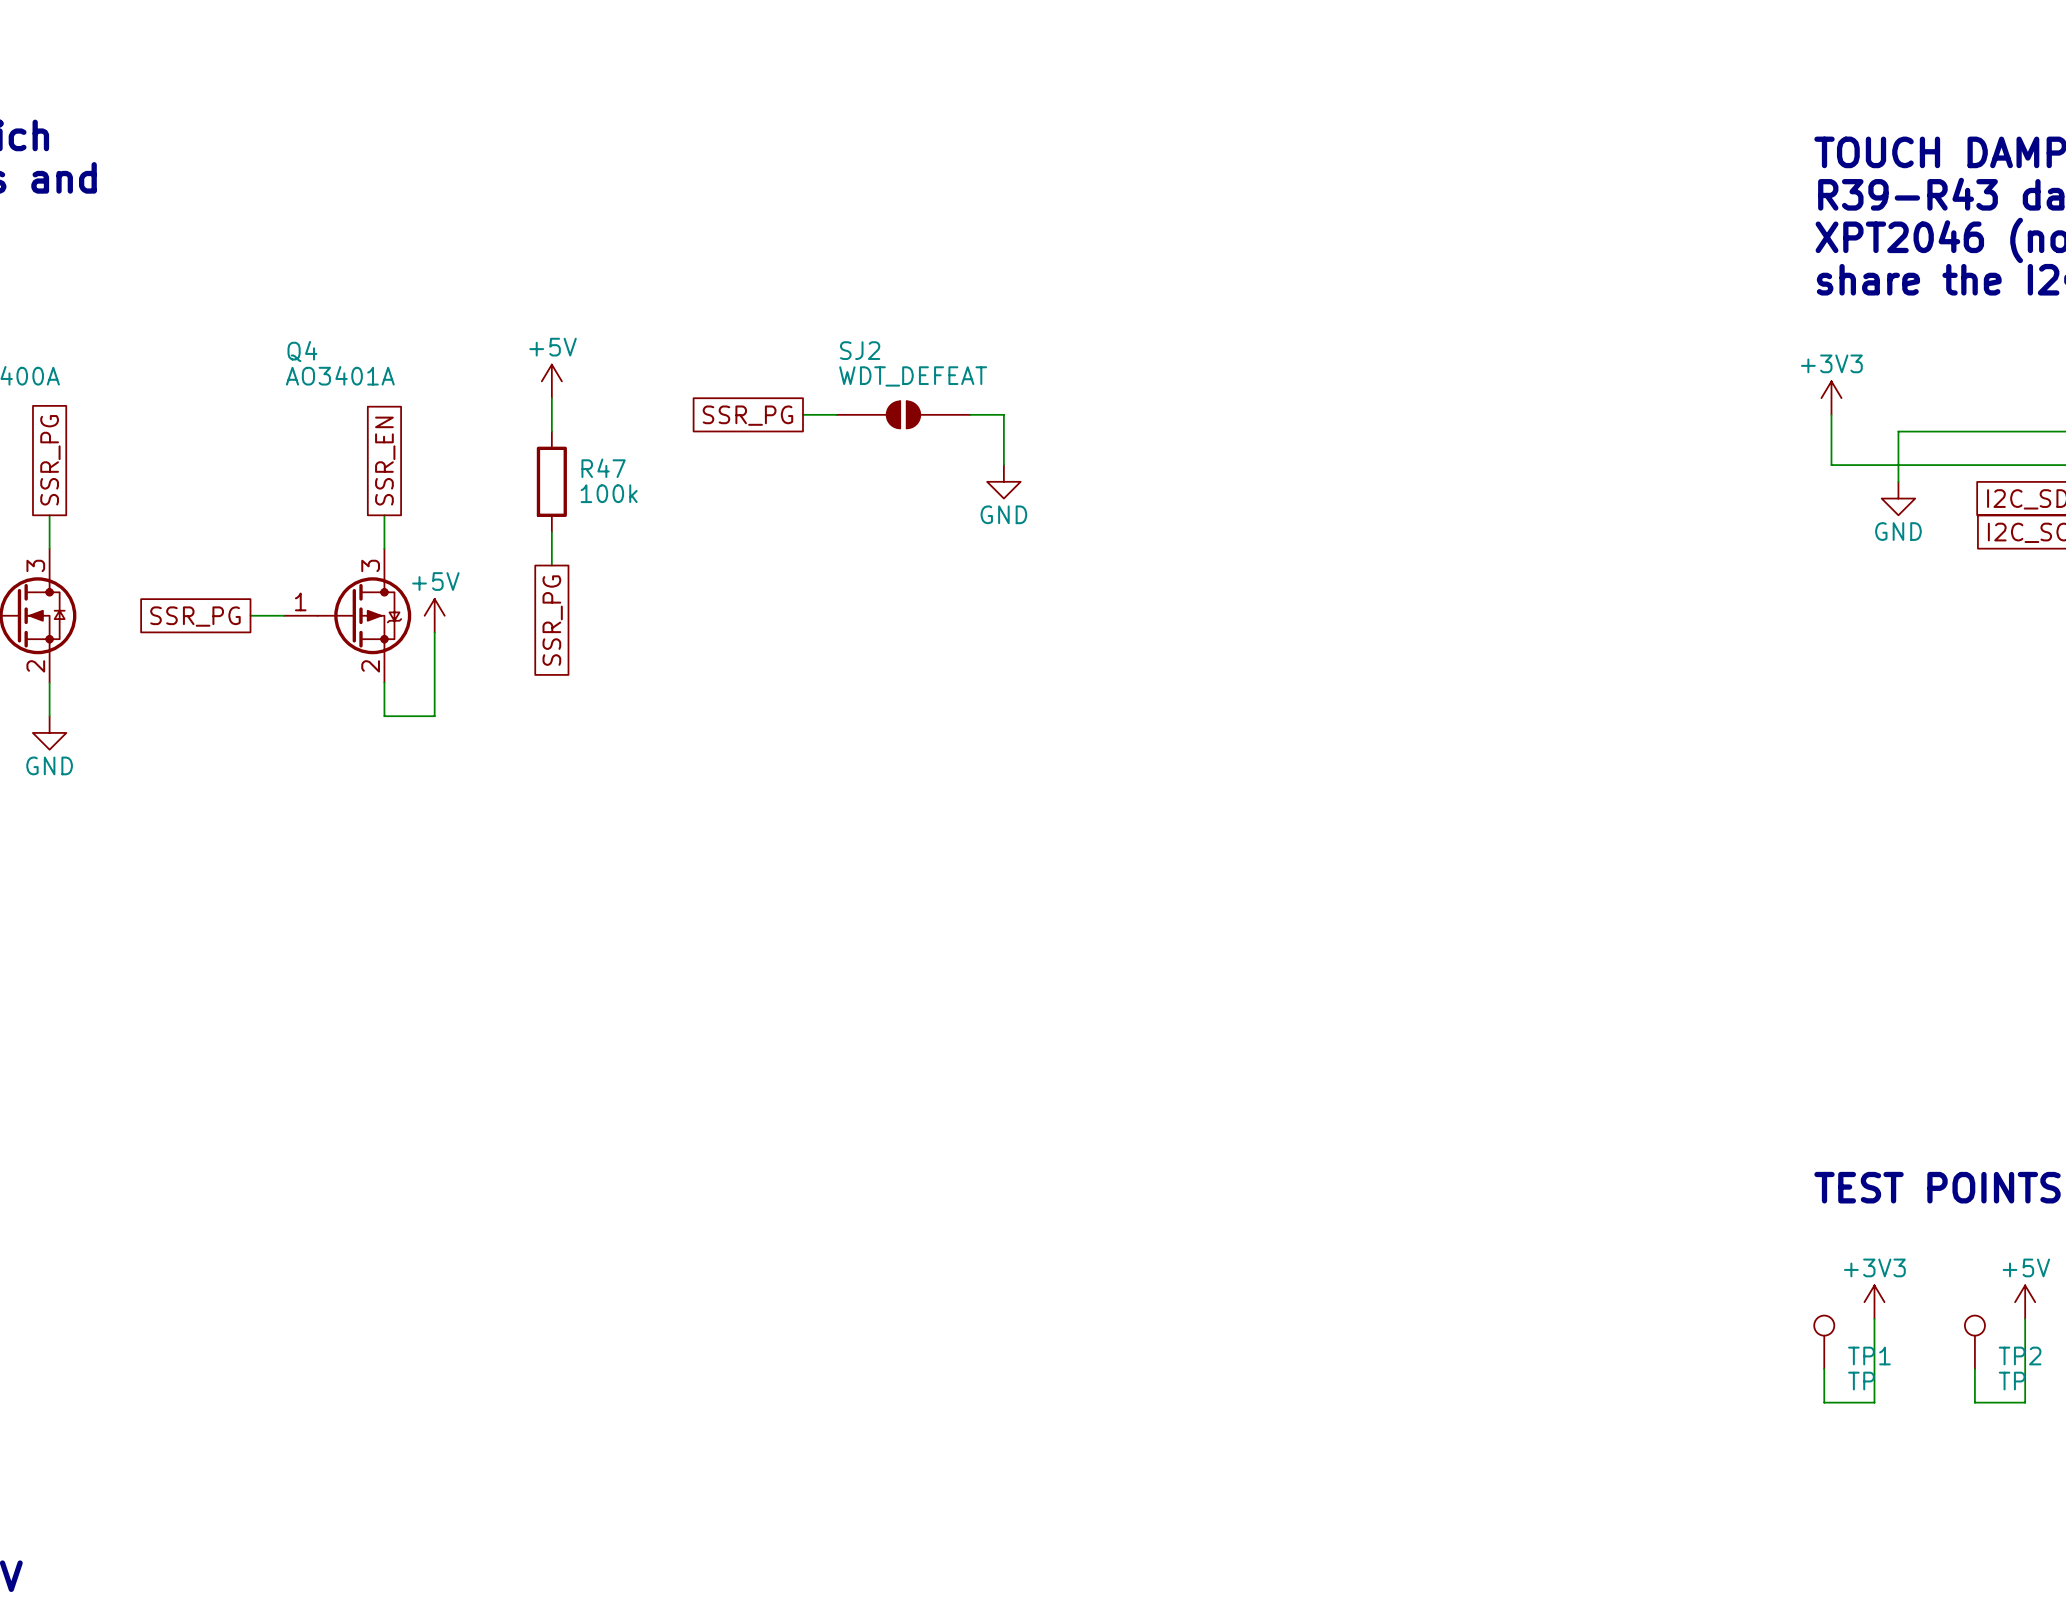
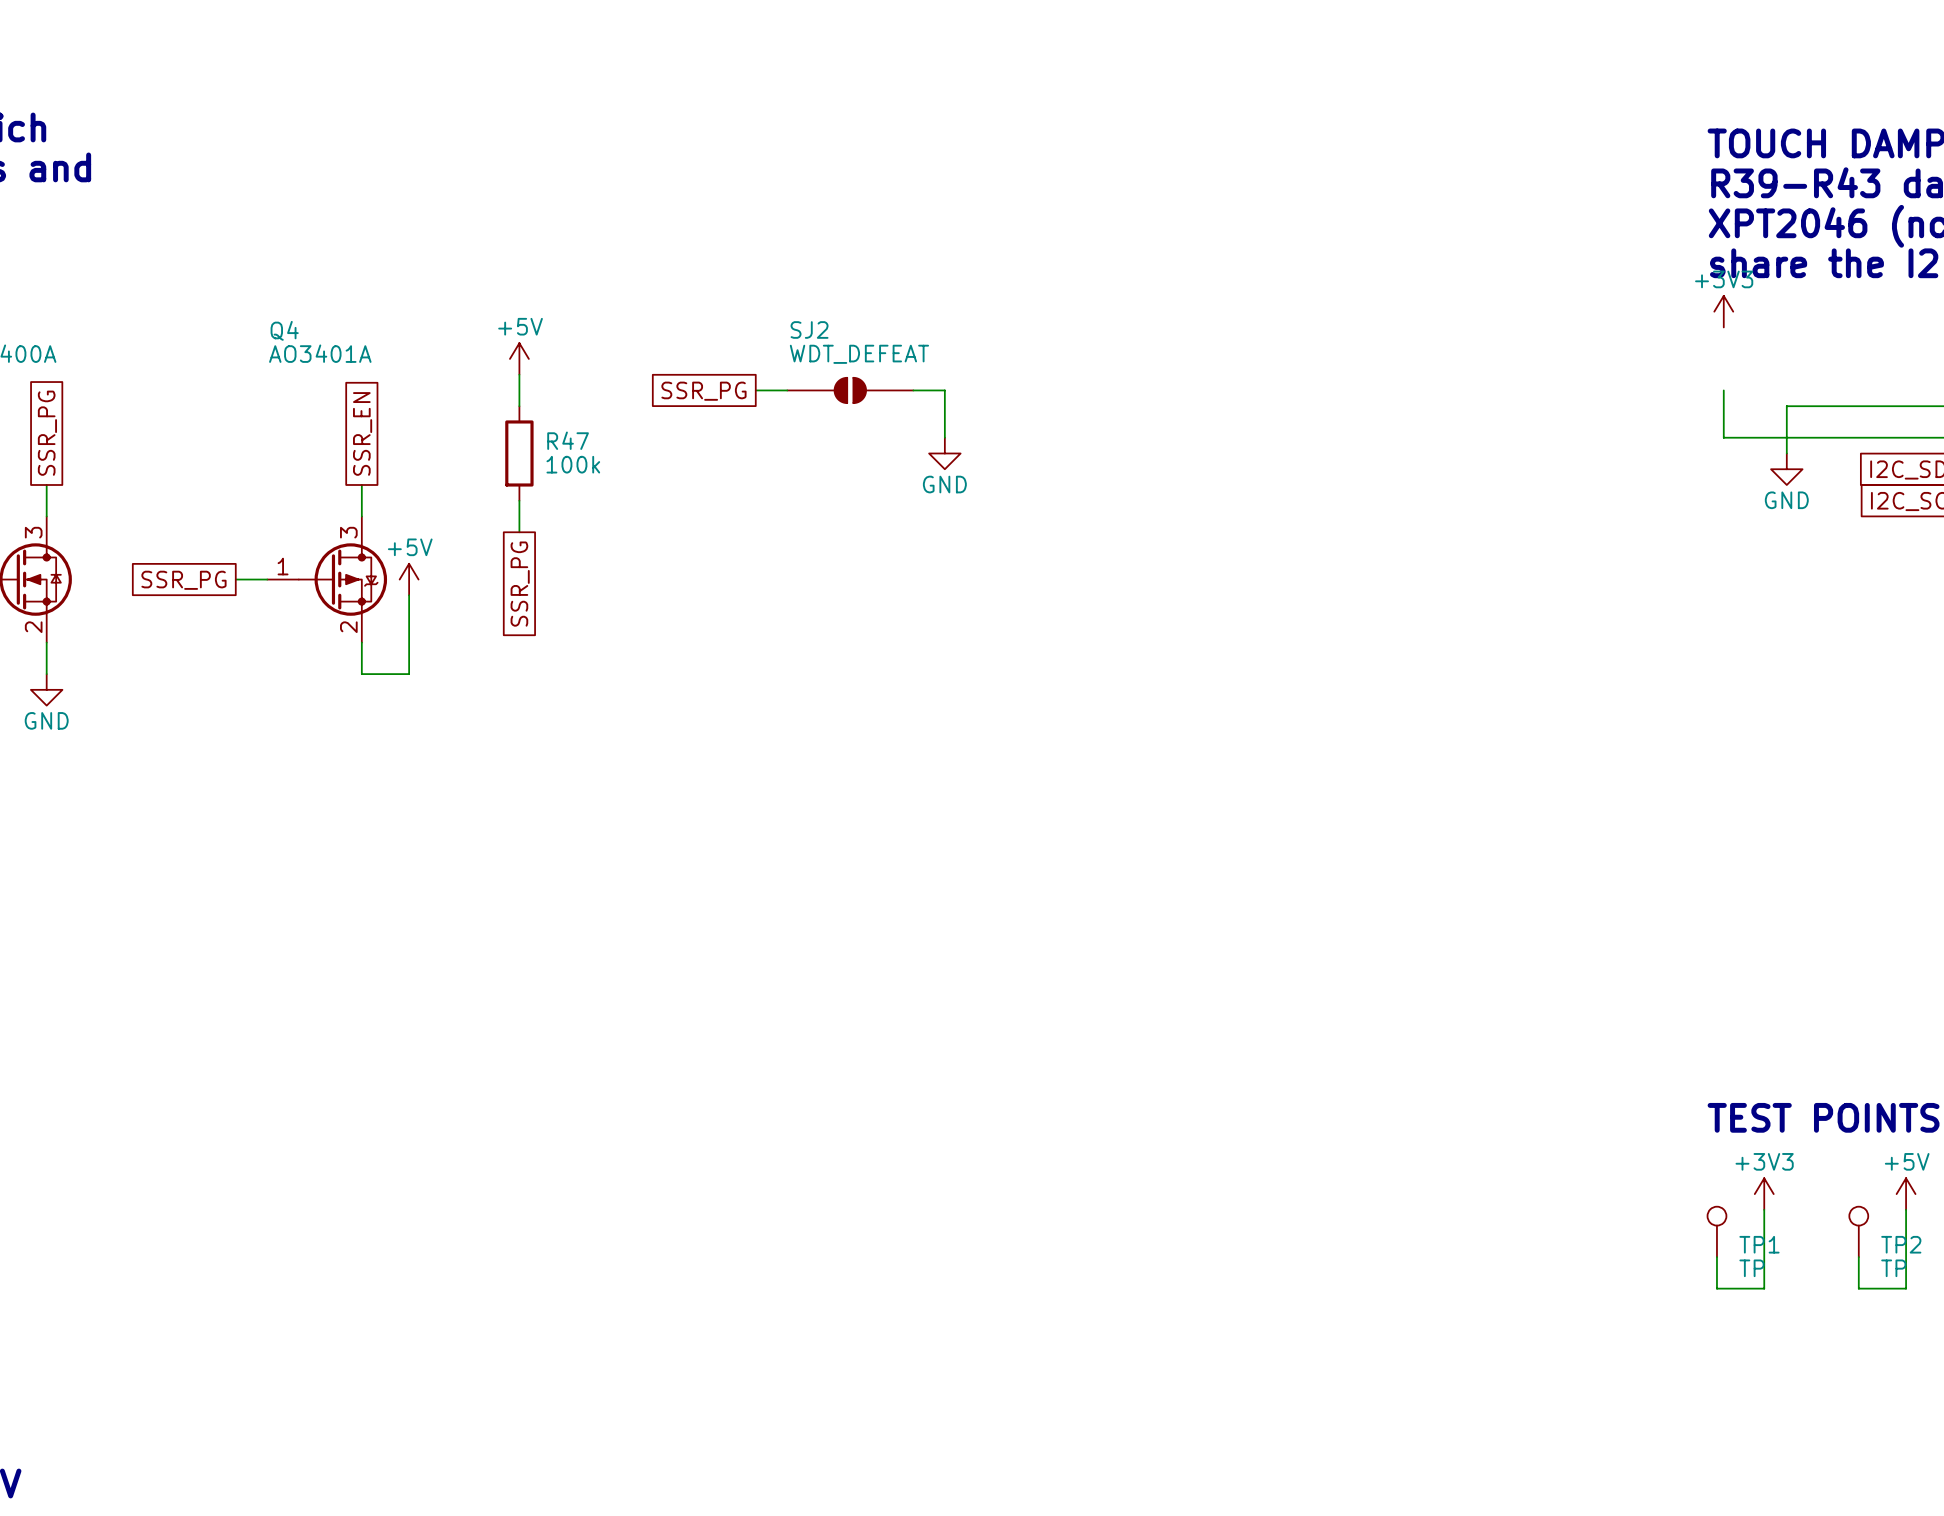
power symbol position: +3V3 (1831, 398) -> +3V3 (1723, 311)
power symbol position: +3V3 (1874, 1302) -> +3V3 (1764, 1194)
power symbol position: +5V (2025, 1302) -> +5V (1906, 1194)
TP1 position: (1824, 1342) -> (1716, 1231)
TP2 position: (1974, 1342) -> (1858, 1231)
wire: (1824, 1369) (1824, 1402) (1874, 1402) (1874, 1369) -> (1716, 1257) (1716, 1288) (1764, 1288)
wire: (1974, 1369) (1974, 1402) (2025, 1402) (2025, 1369) -> (1858, 1257) (1858, 1288) (1906, 1288)

